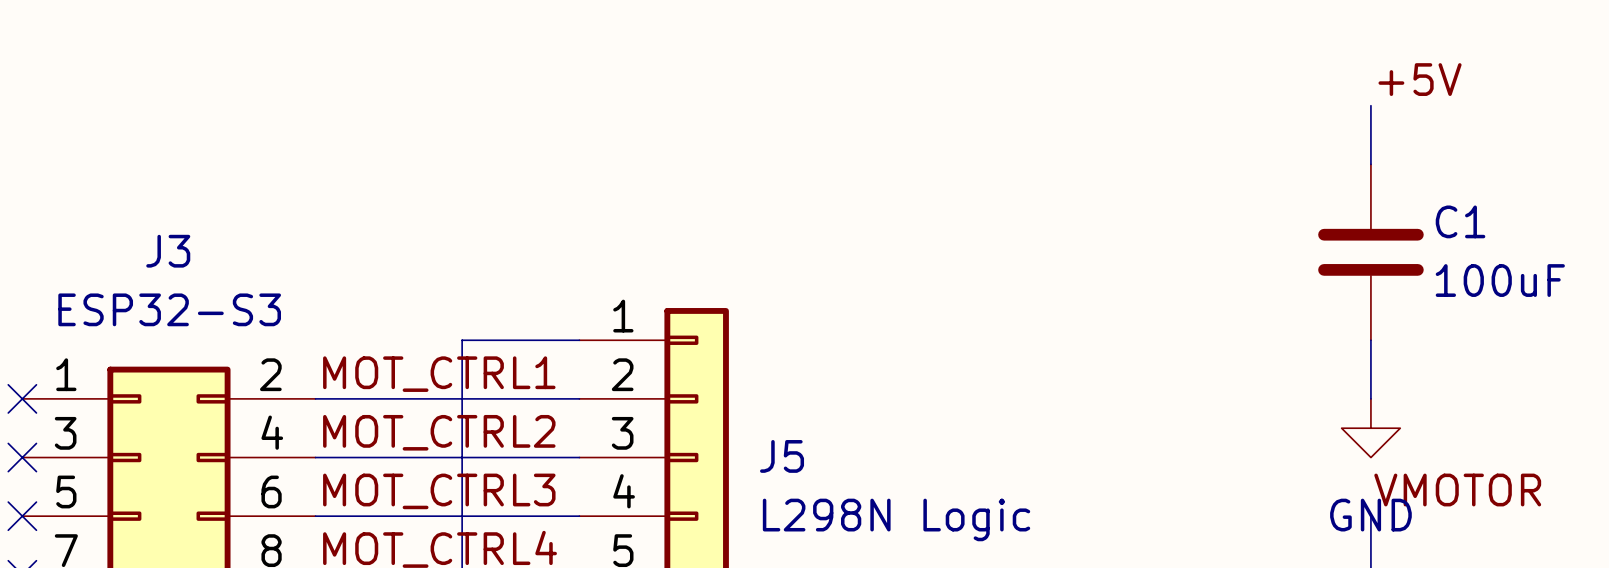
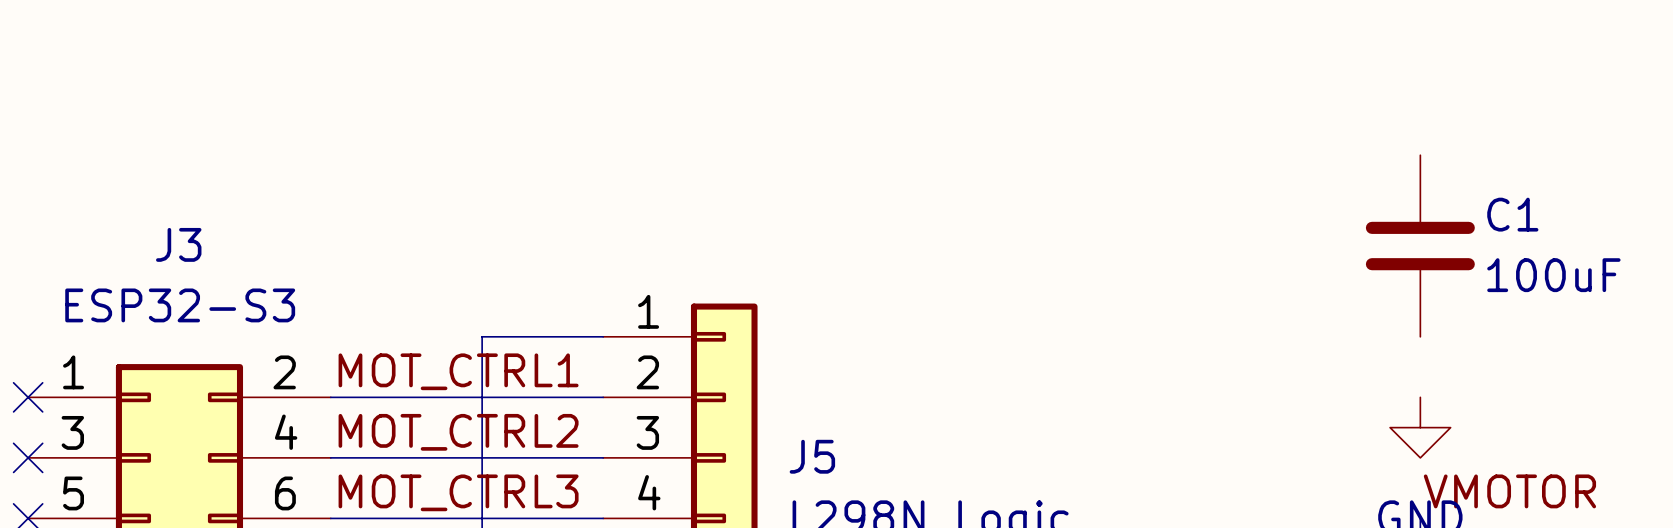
label: +5V (1420, 79) -> none
wire: (1370, 105) (1370, 164) -> none
wire: (1370, 340) (1370, 398) -> none

